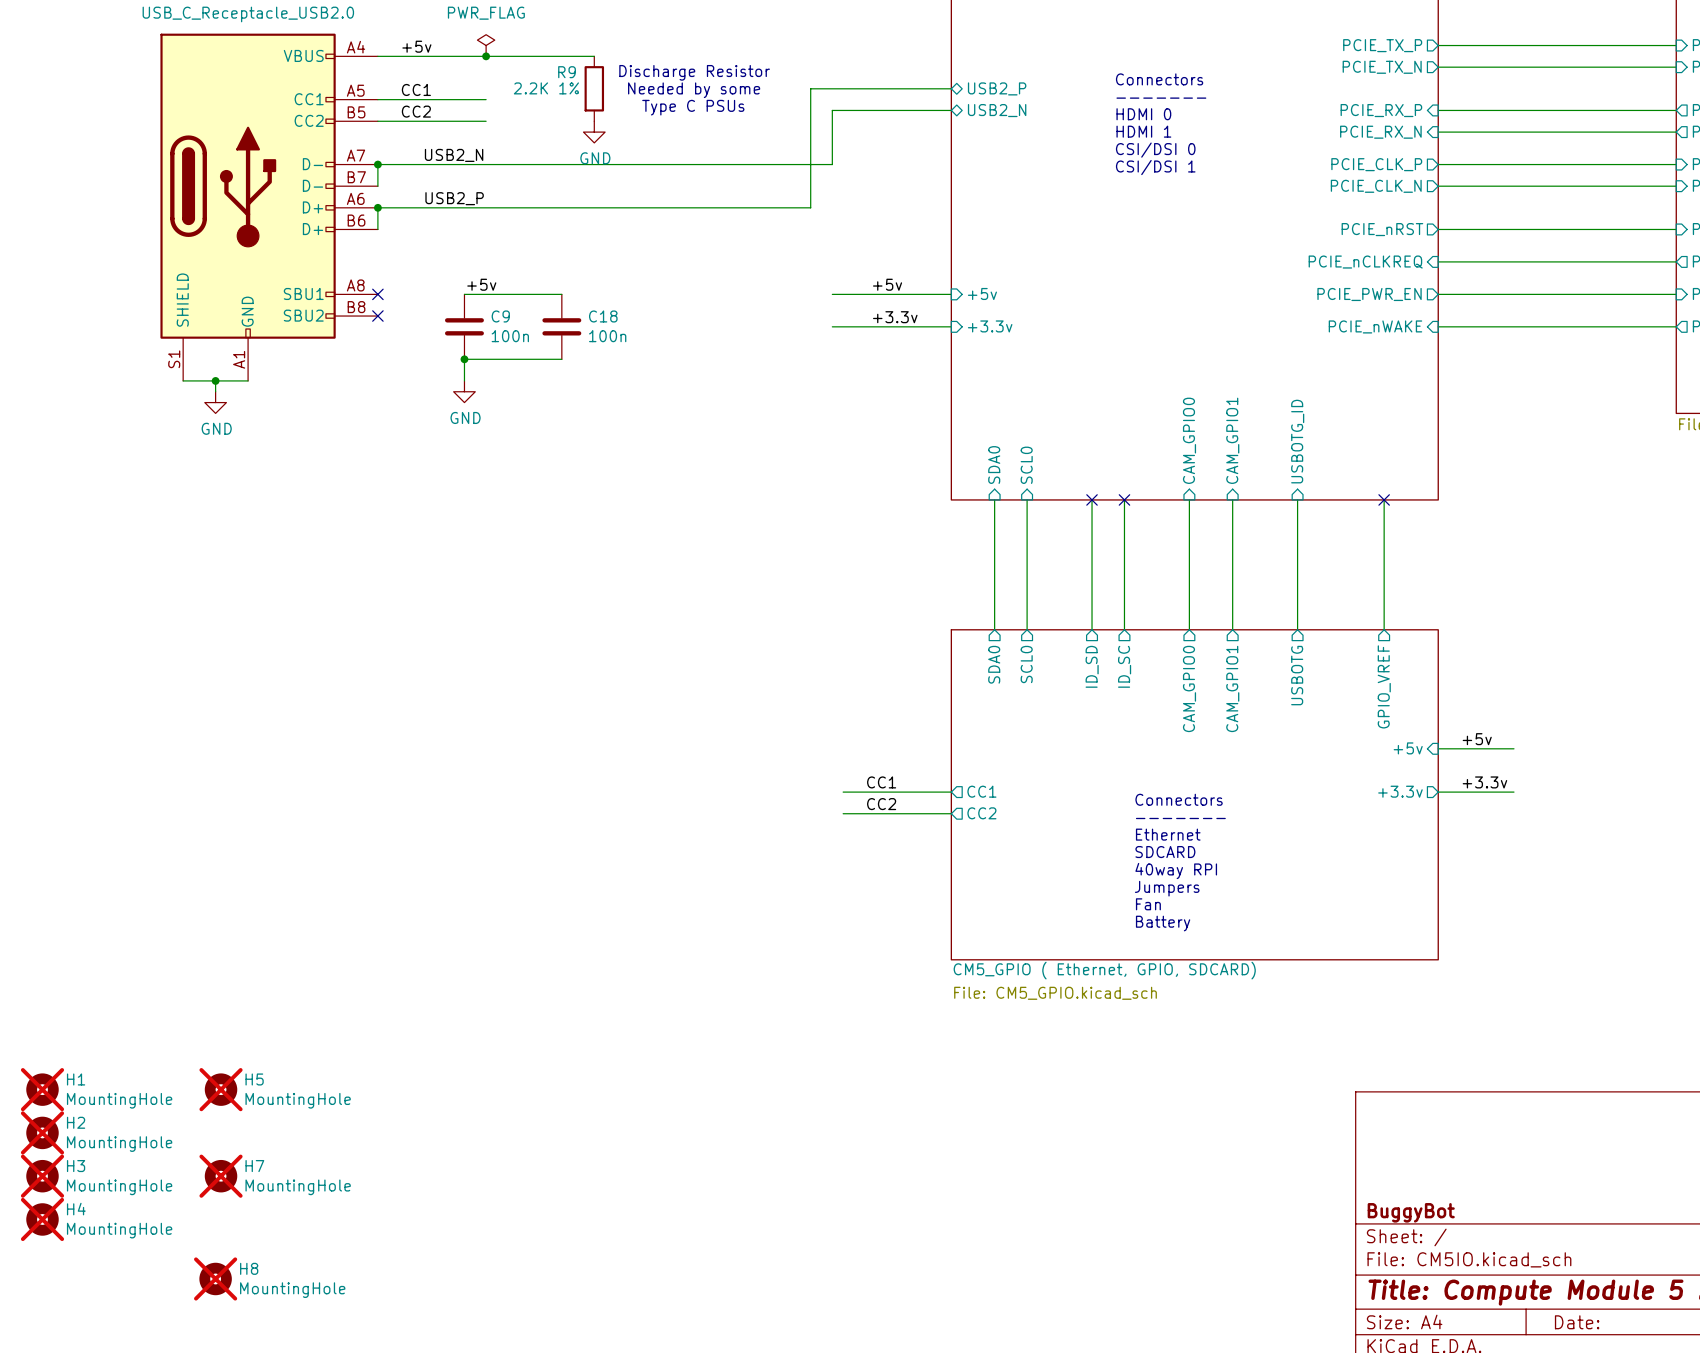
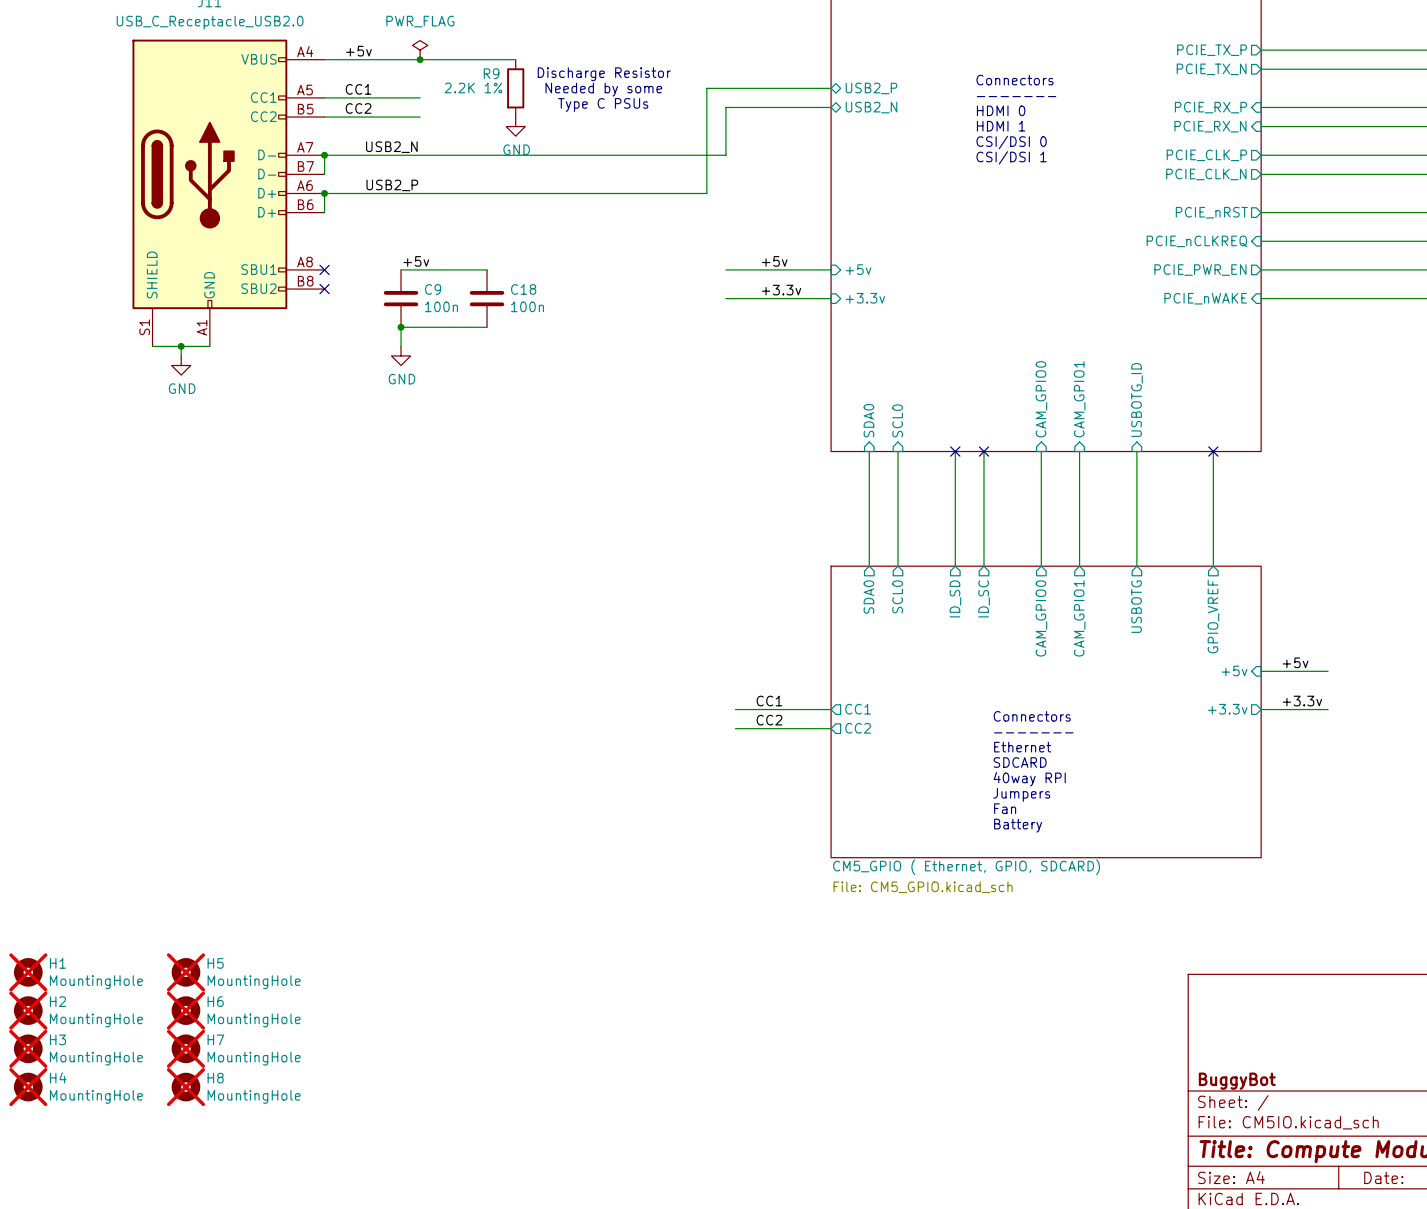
H6: none -> MountingHole (185, 1010)
H8 position: (215, 1278) -> (185, 1087)

